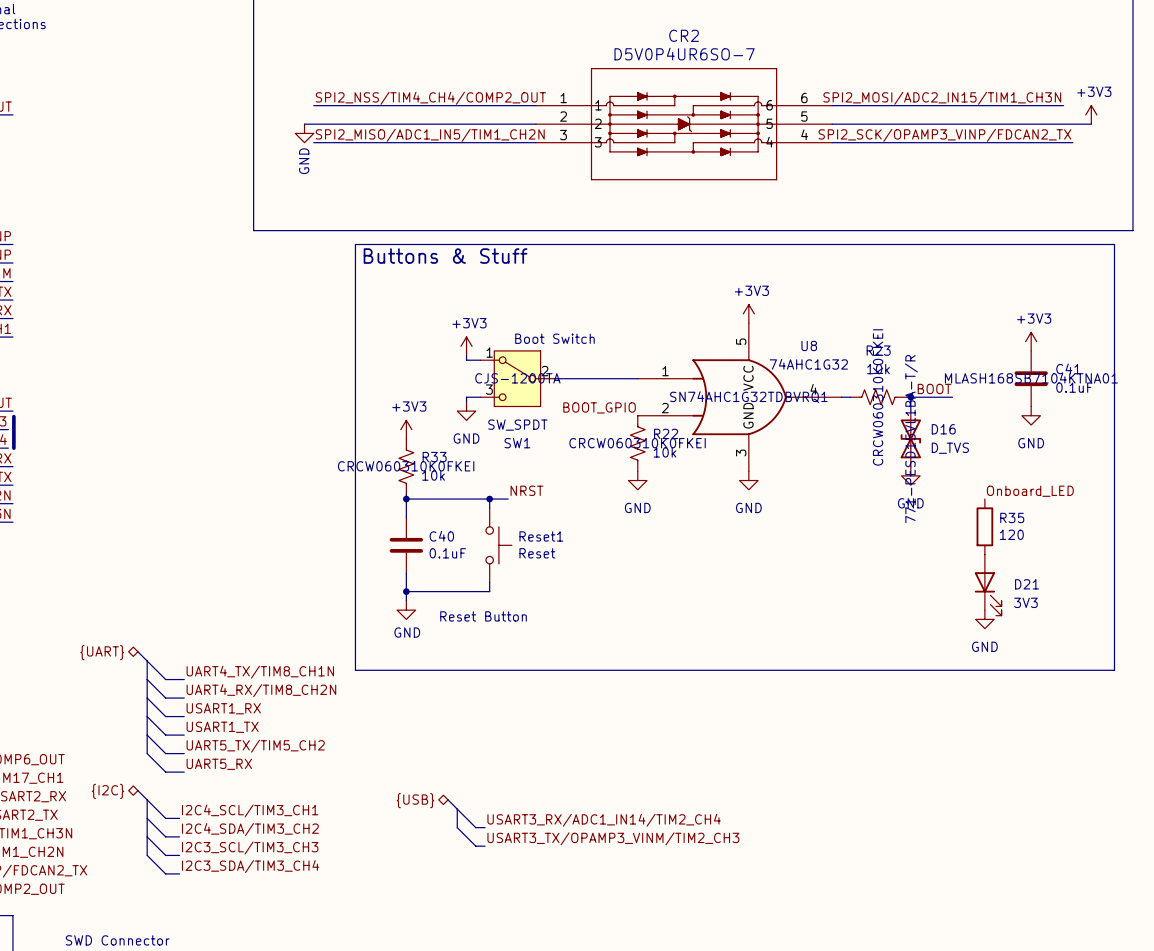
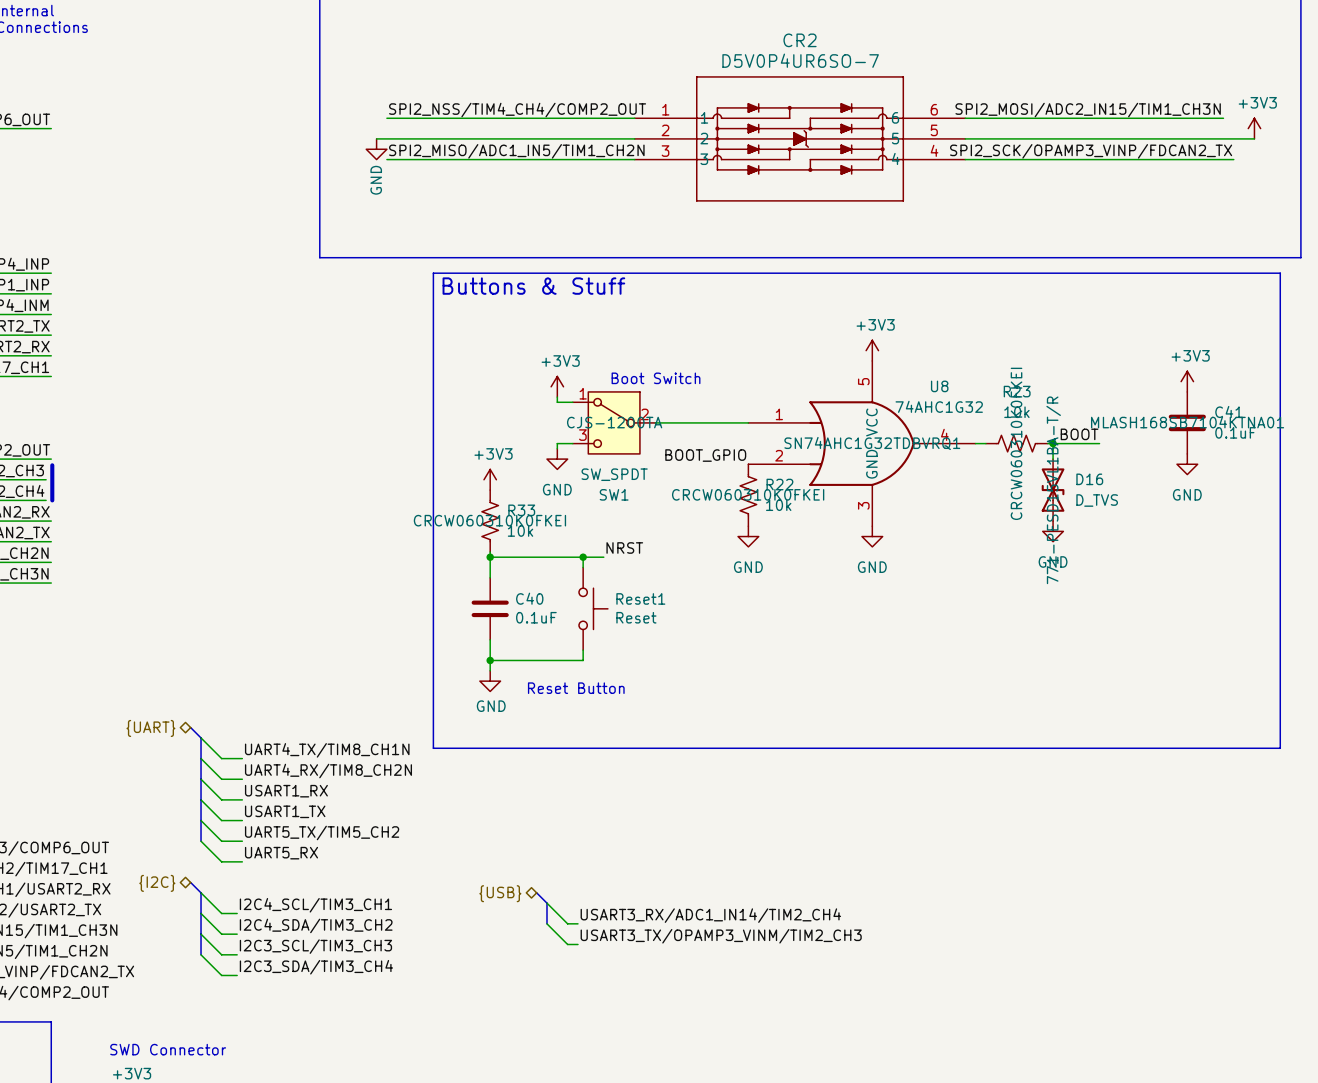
label: Onboard_LED (1030, 491) -> none
R35: 120 (984, 526) -> none
D21: 3V3 (988, 585) -> none
power symbol: GND (984, 619) -> none

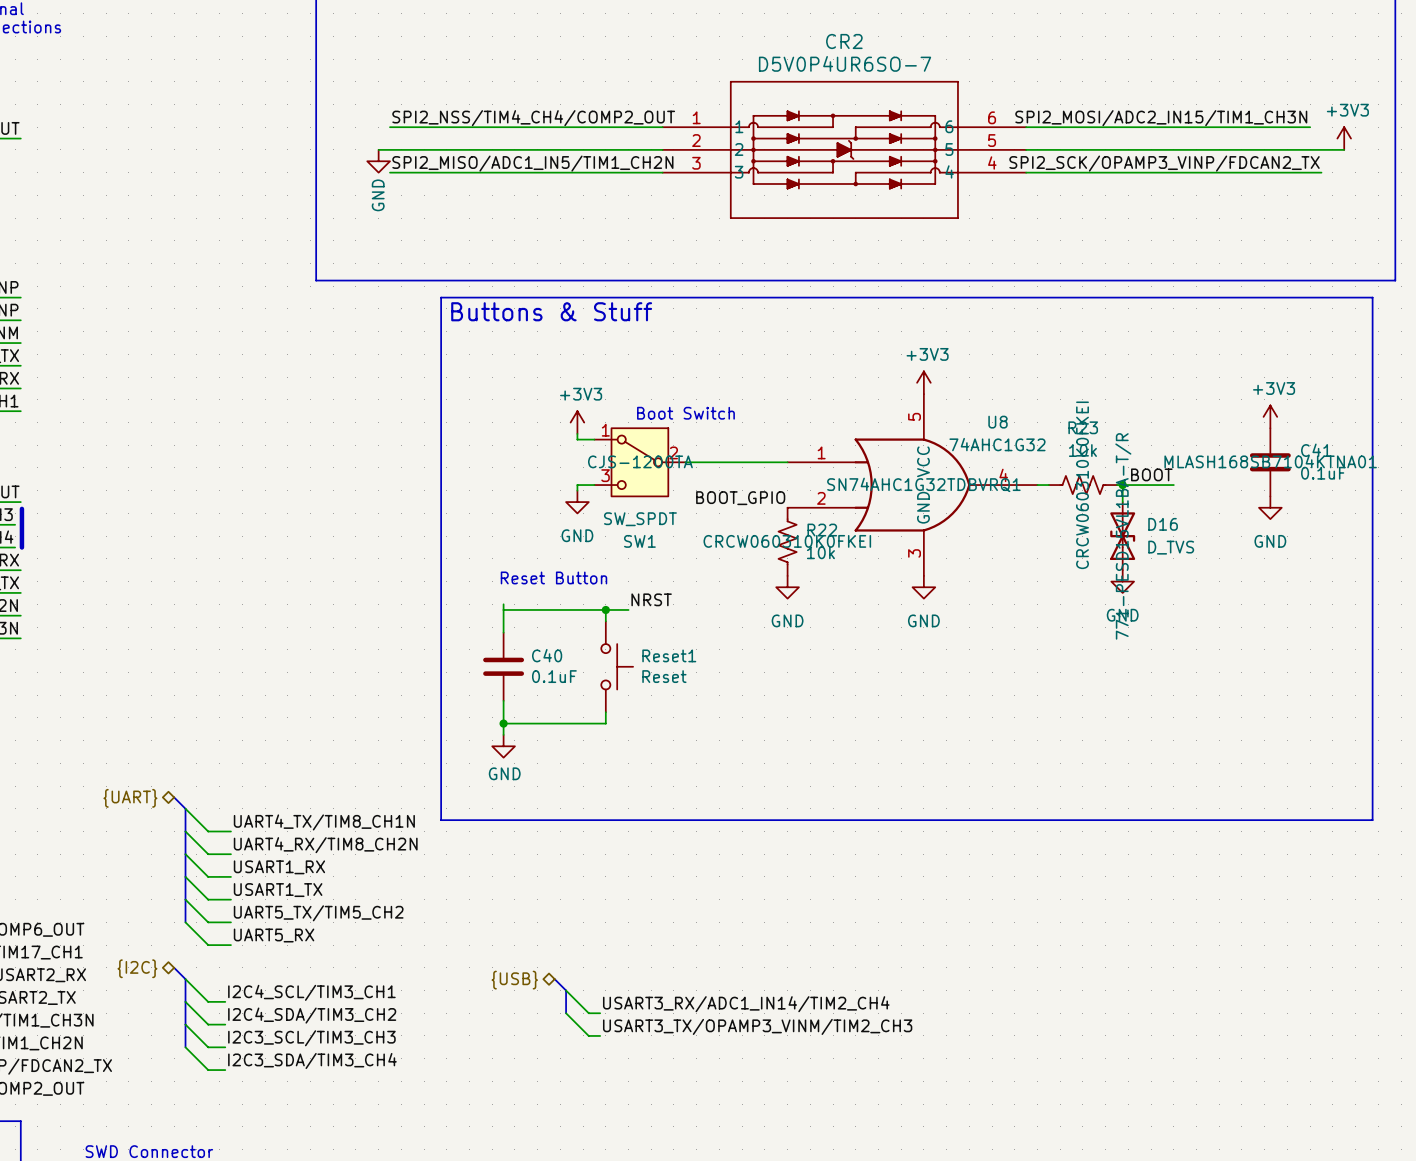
power symbol: +3V3 (490, 479) -> none
R33: 10k (490, 521) -> none
junction: (490, 557) -> none
text position: Reset Button (576, 688) -> Reset Button (553, 577)

